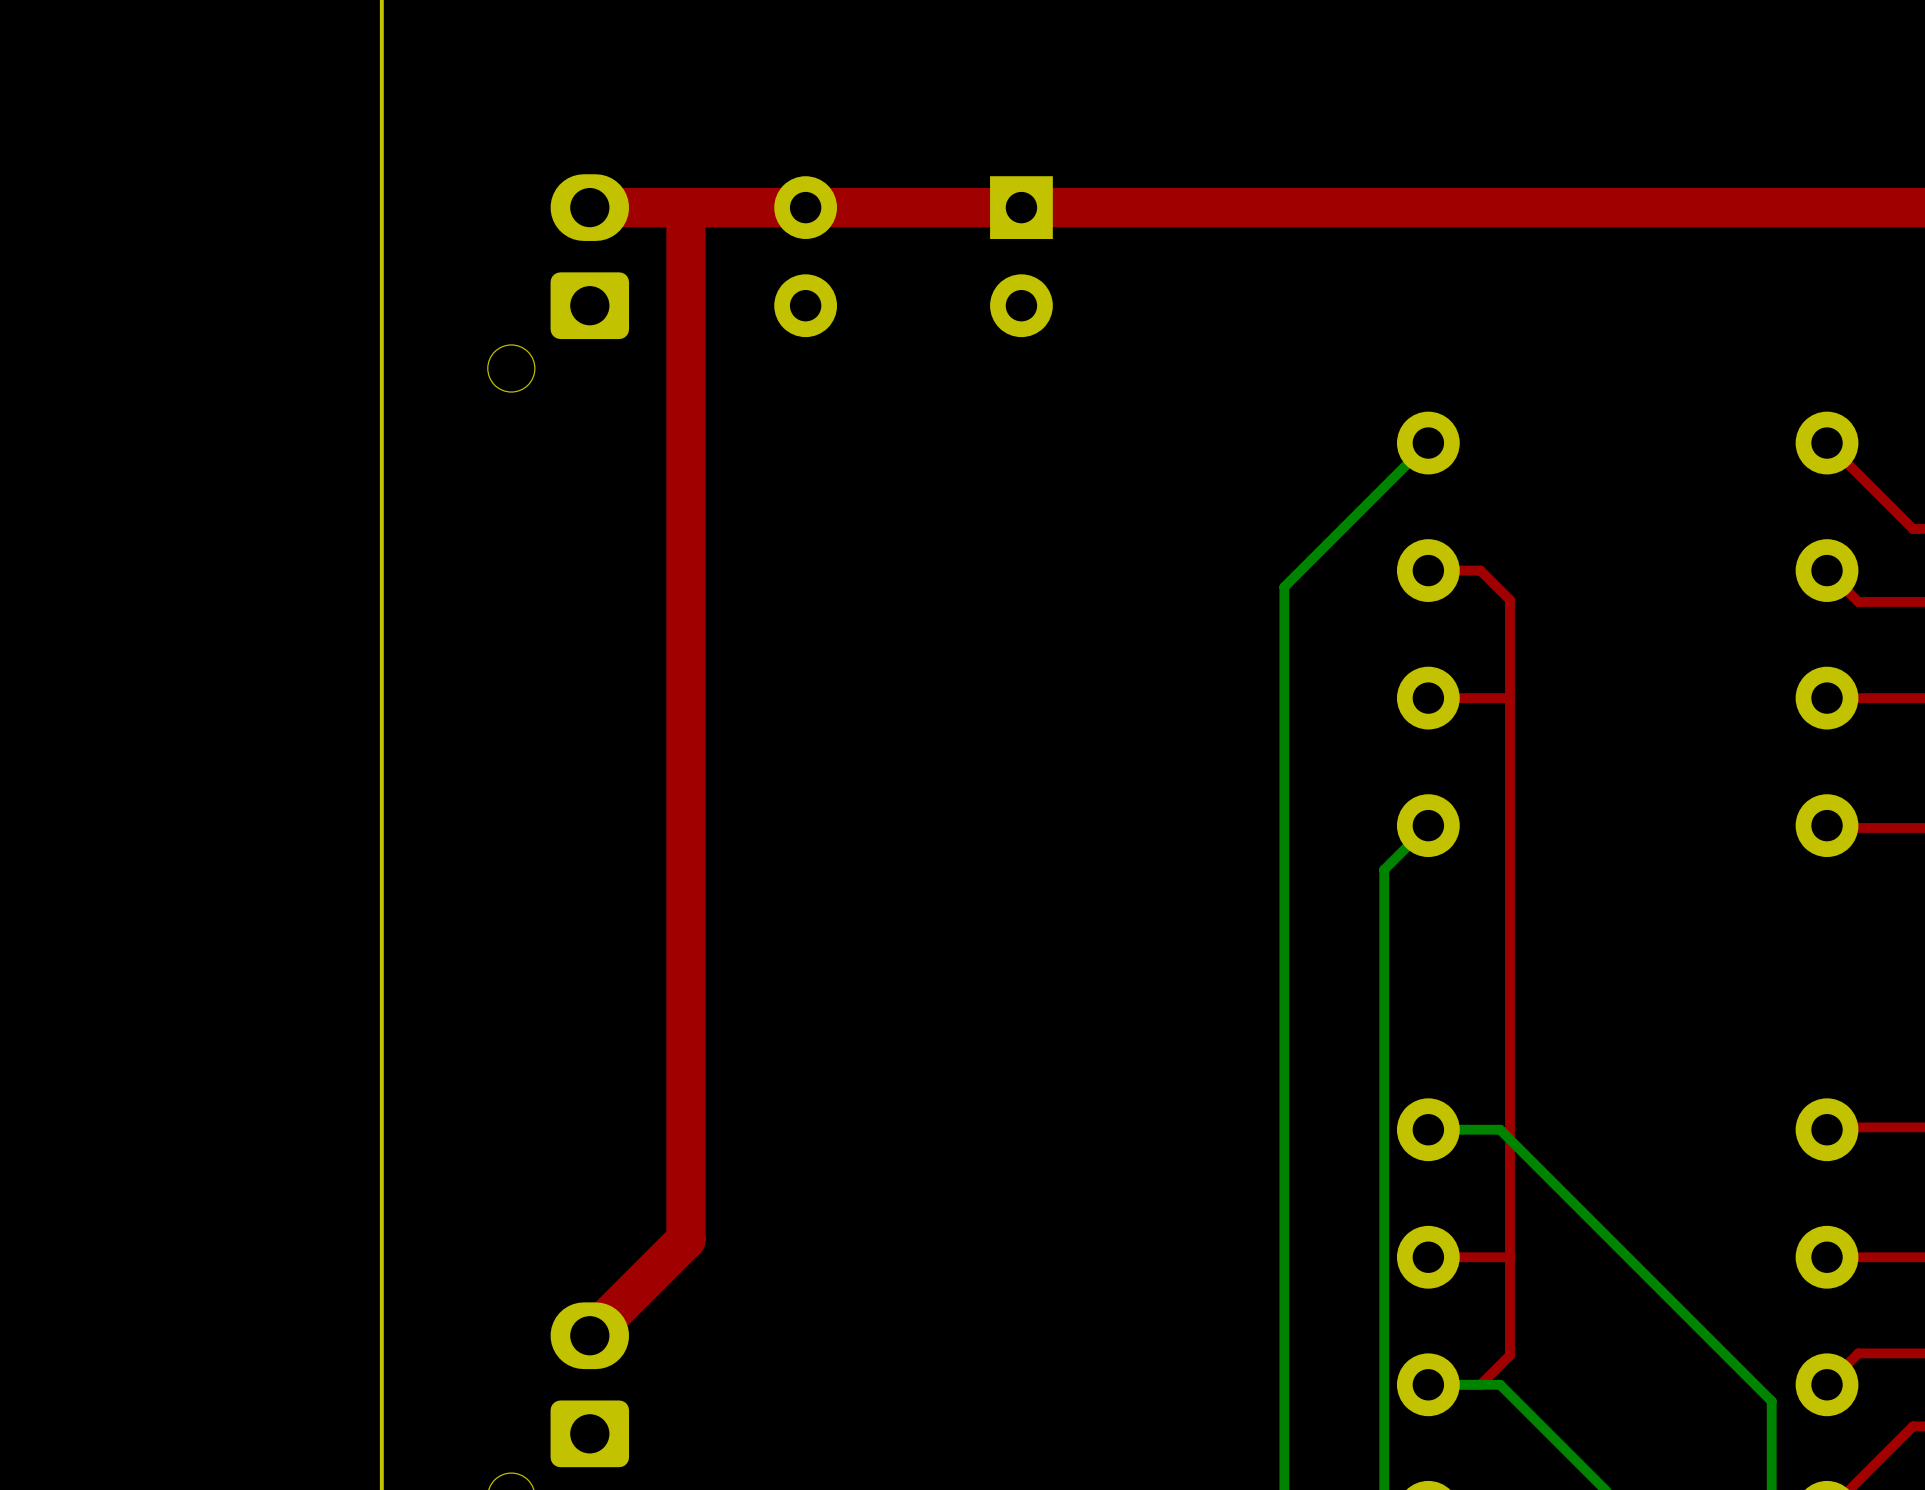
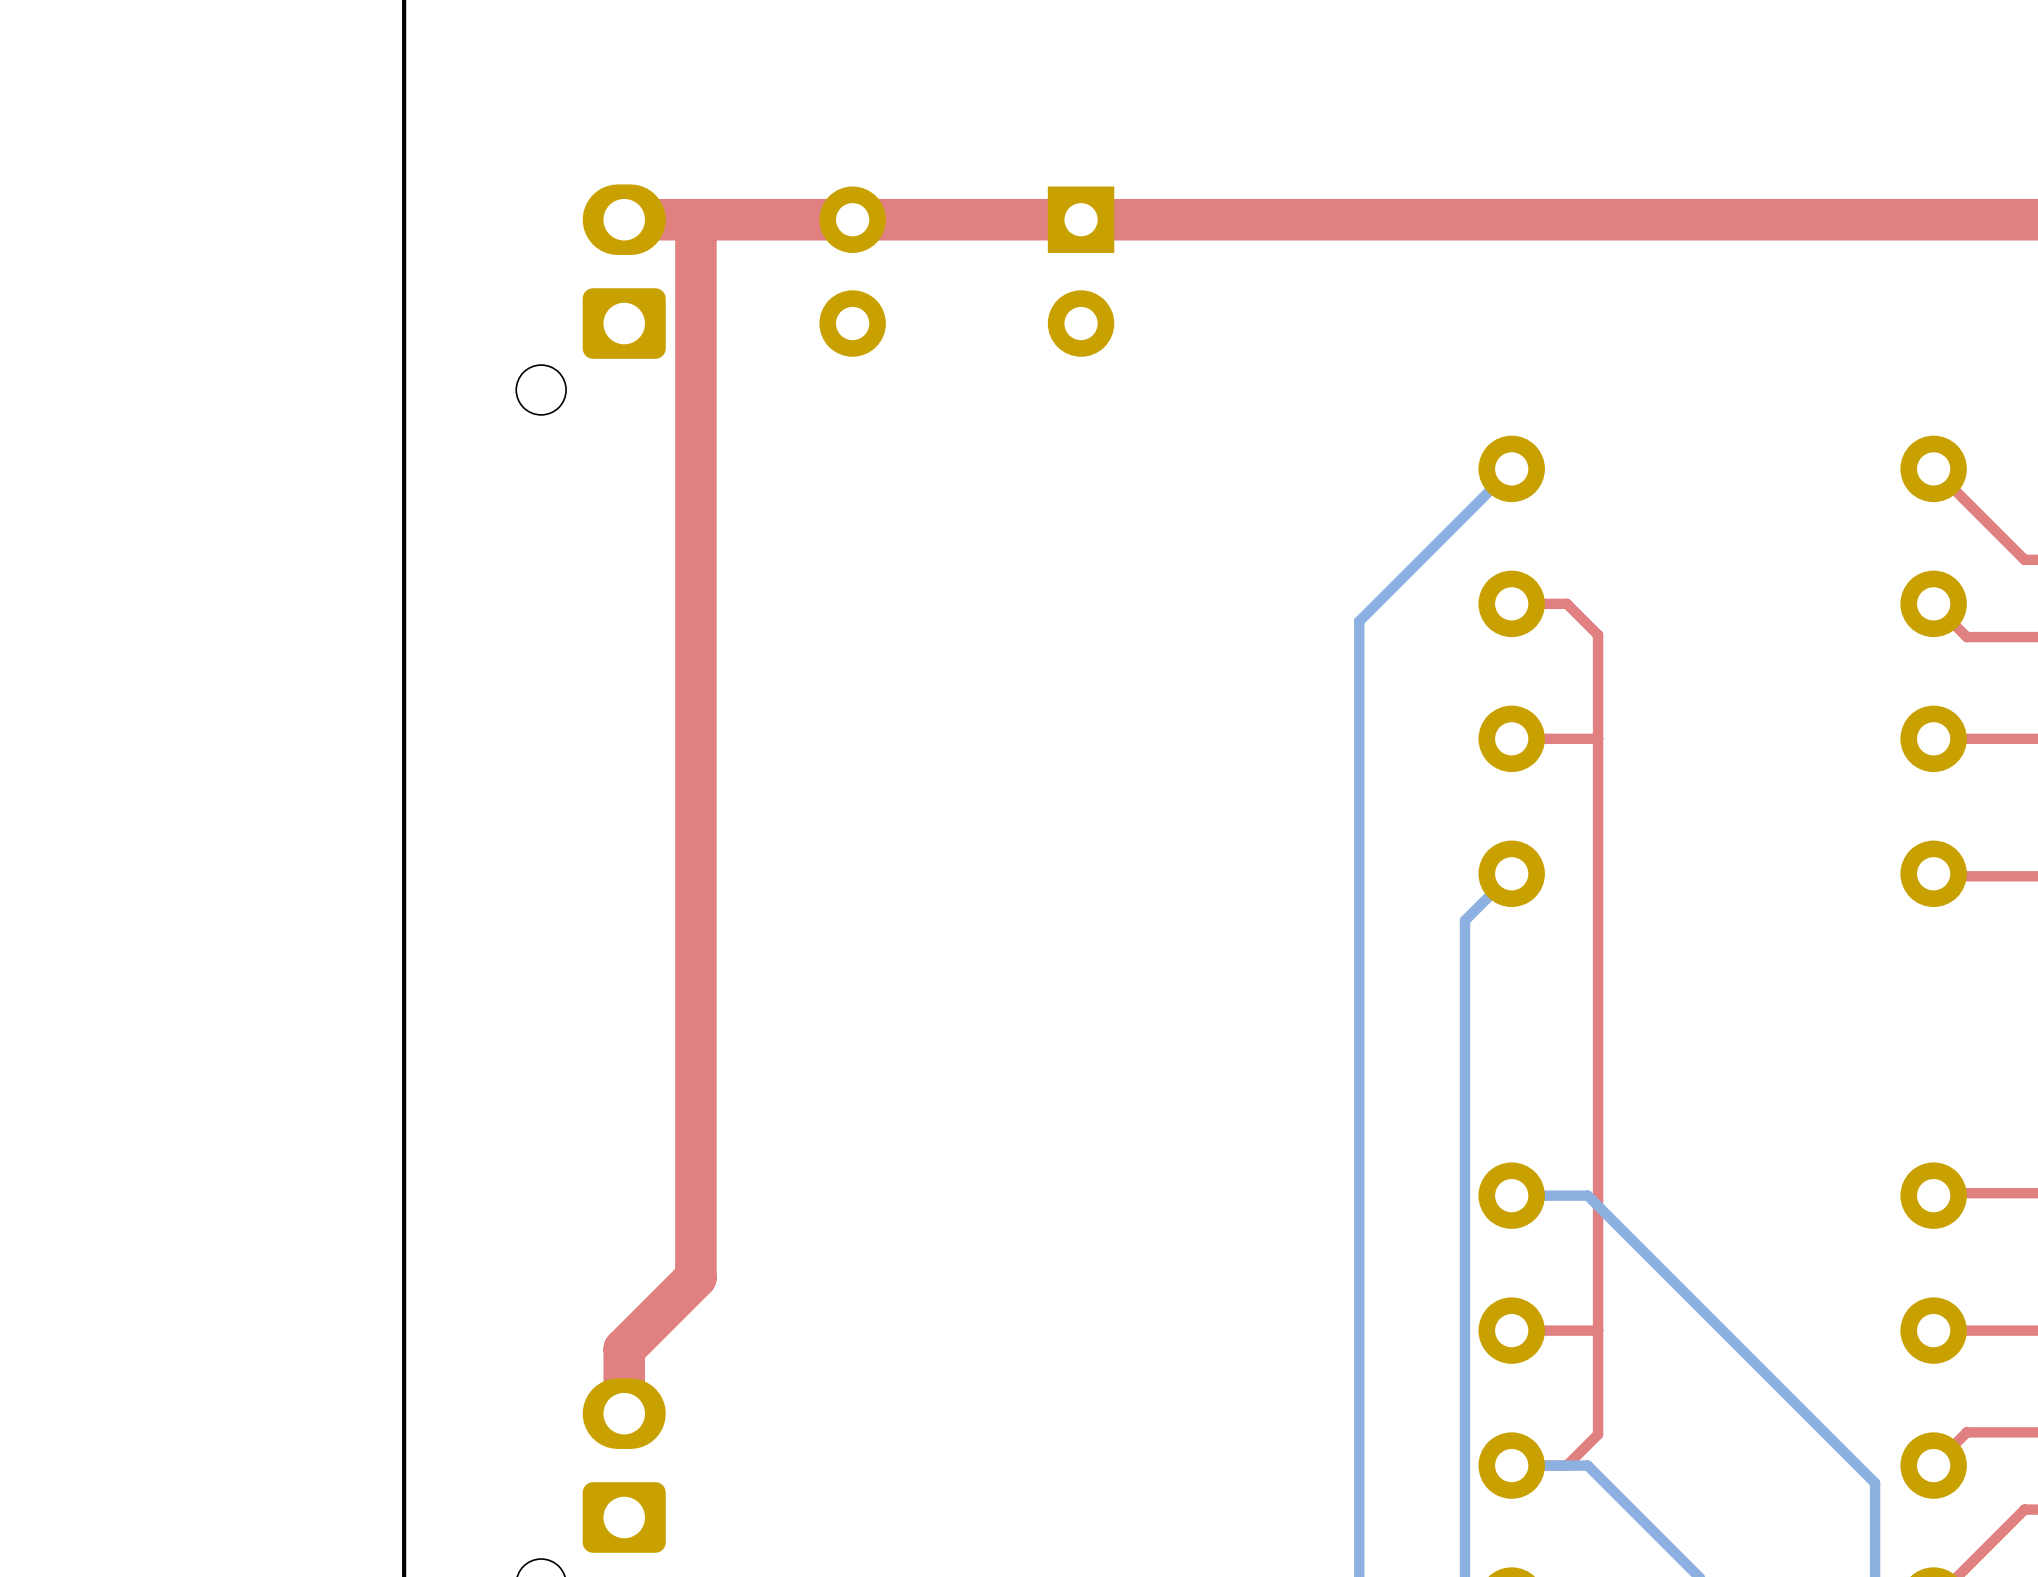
top track: (685, 207) (685, 1239) (589, 1335) -> (695, 219) (695, 1277) (624, 1349) (624, 1413)

